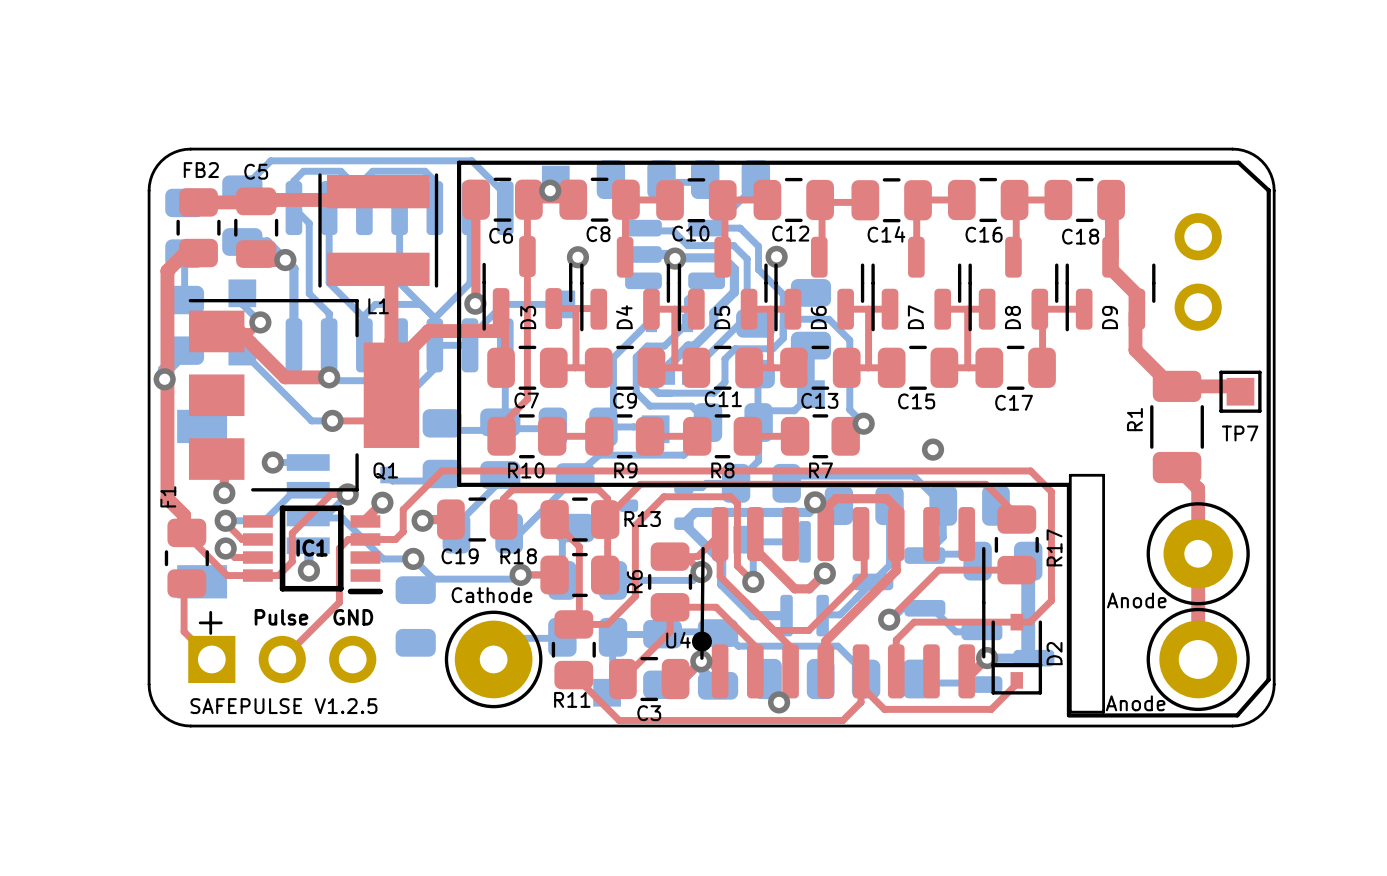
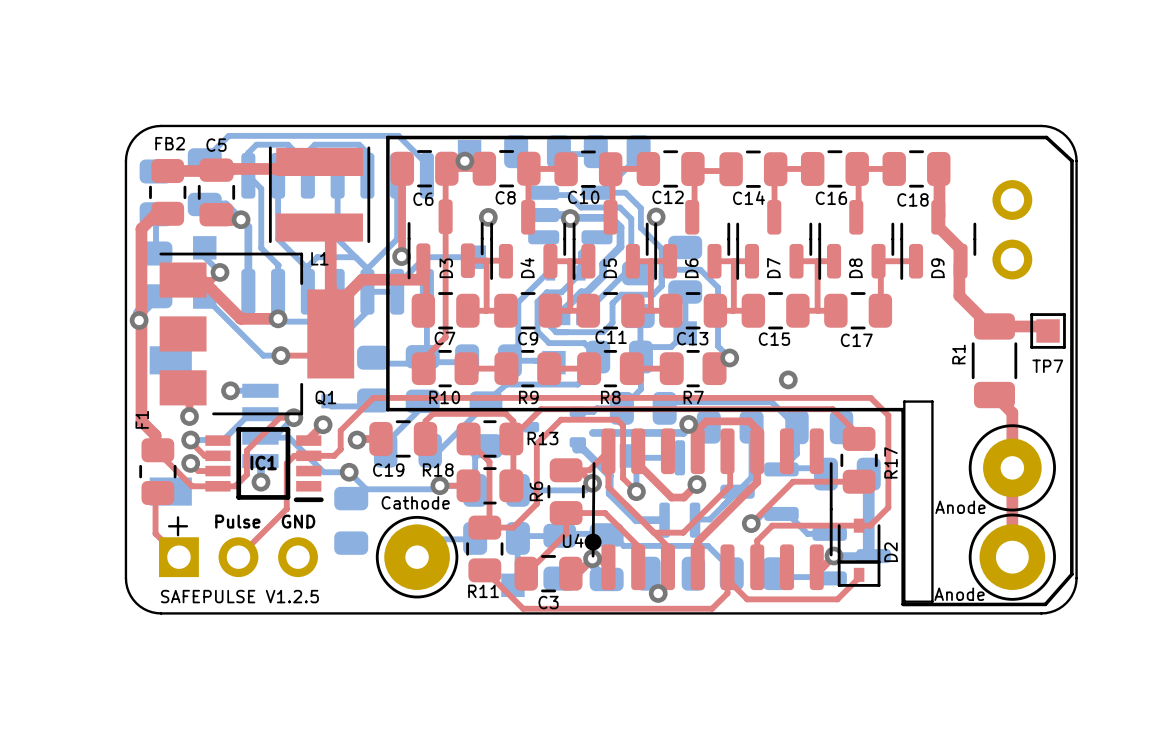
bottom track: (701, 512) (695, 512) (683, 523) (721, 562) -> (576, 446) (576, 449) (583, 449) (609, 475)

